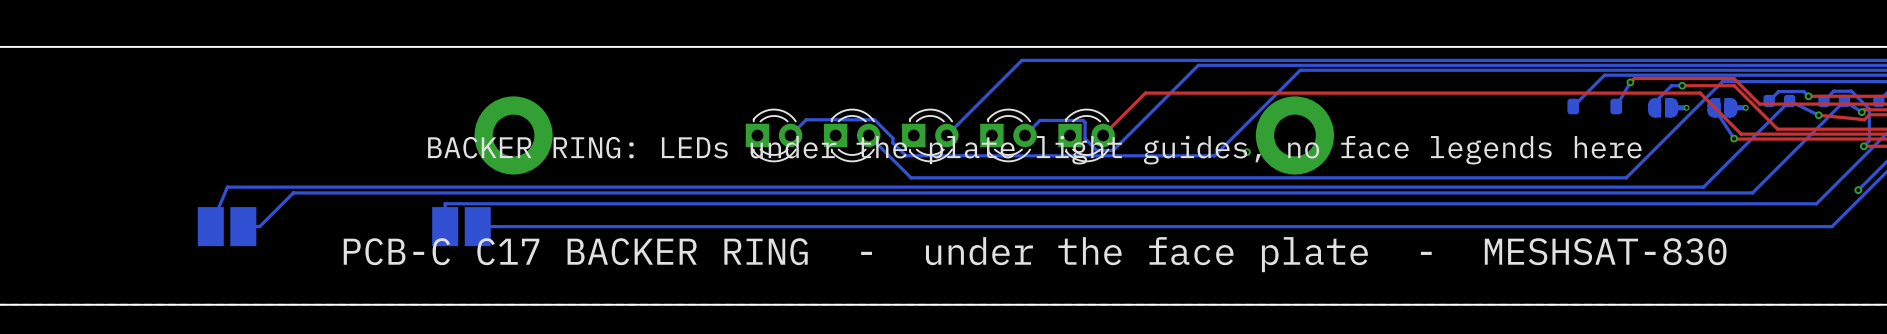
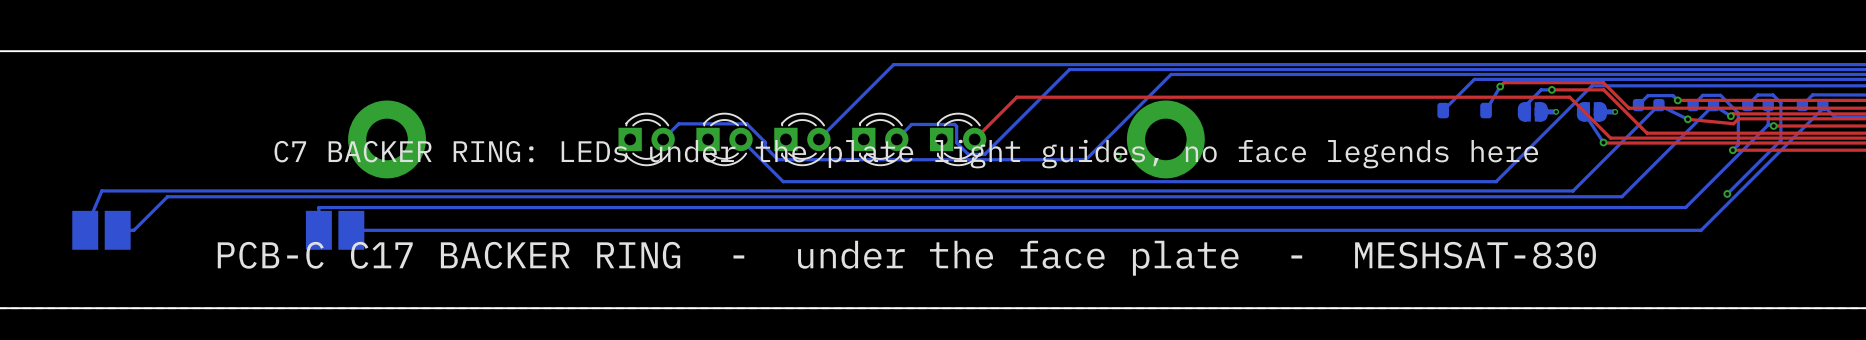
text: BACKER RING: LEDs under the plate light guides, no face legends here (1034, 150) -> C7 BACKER RING: LEDs under the plate light guides, no face legends here (906, 154)

